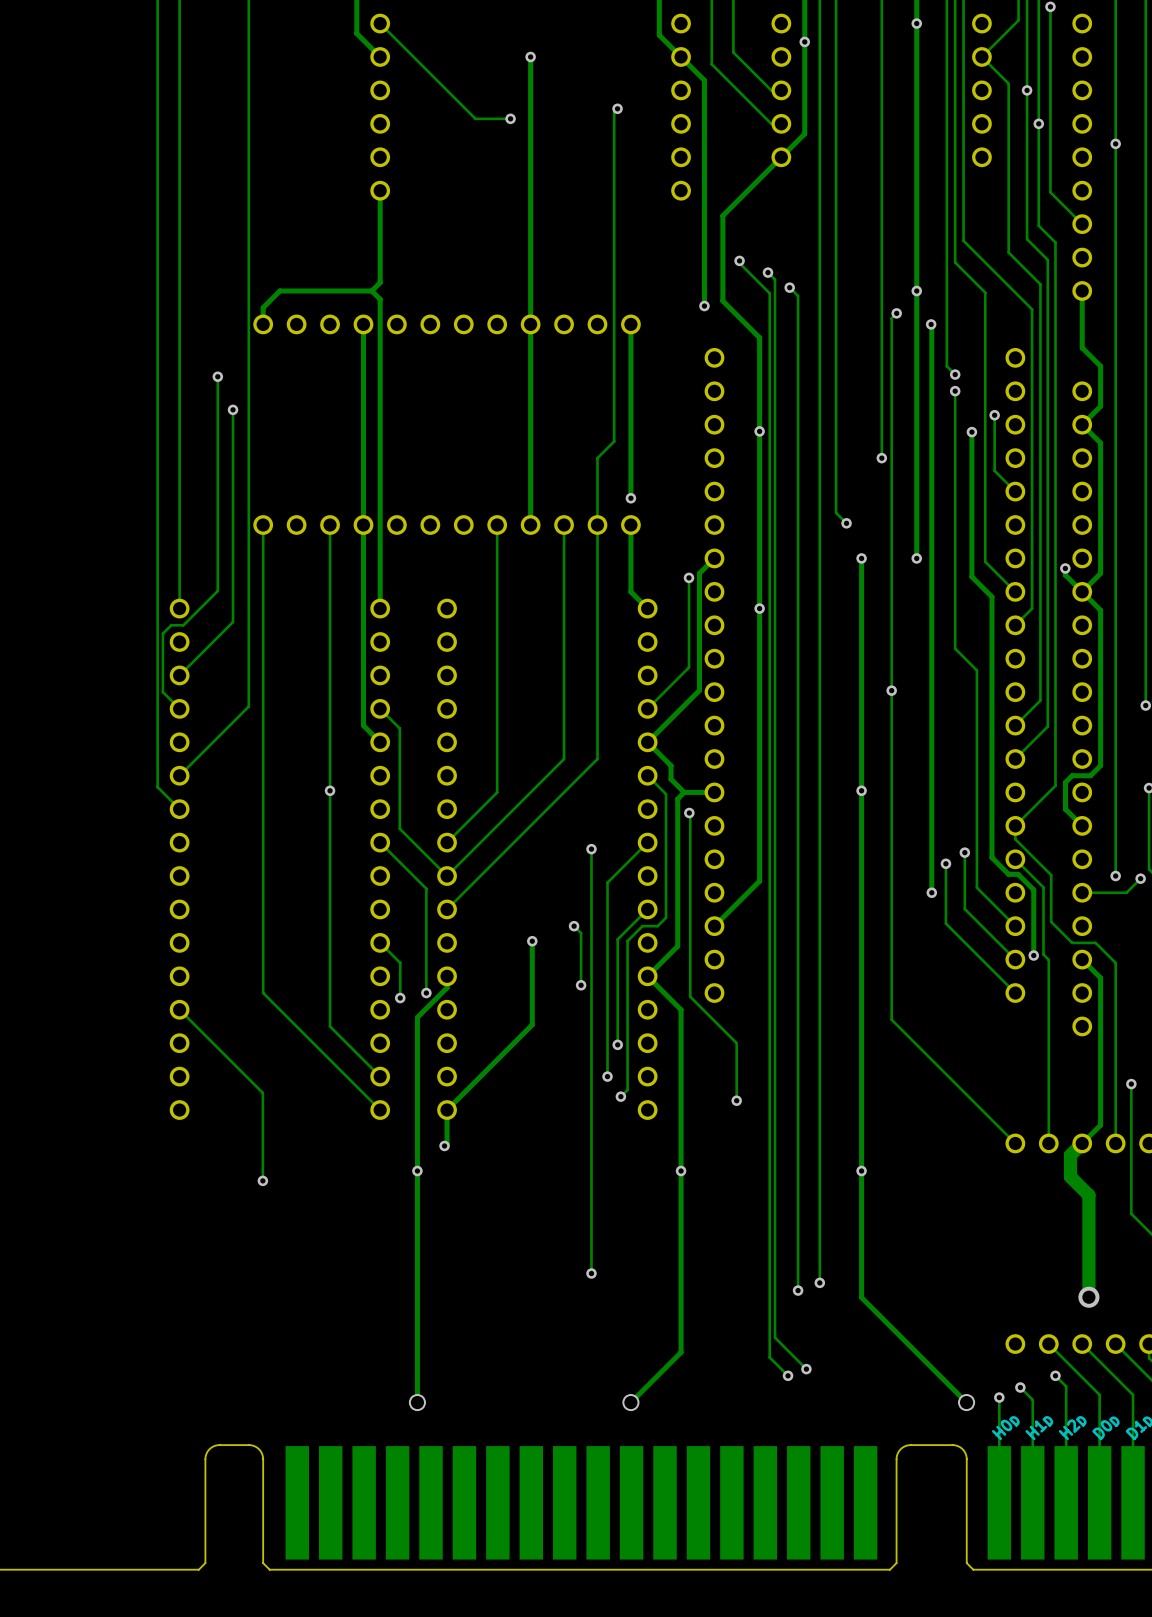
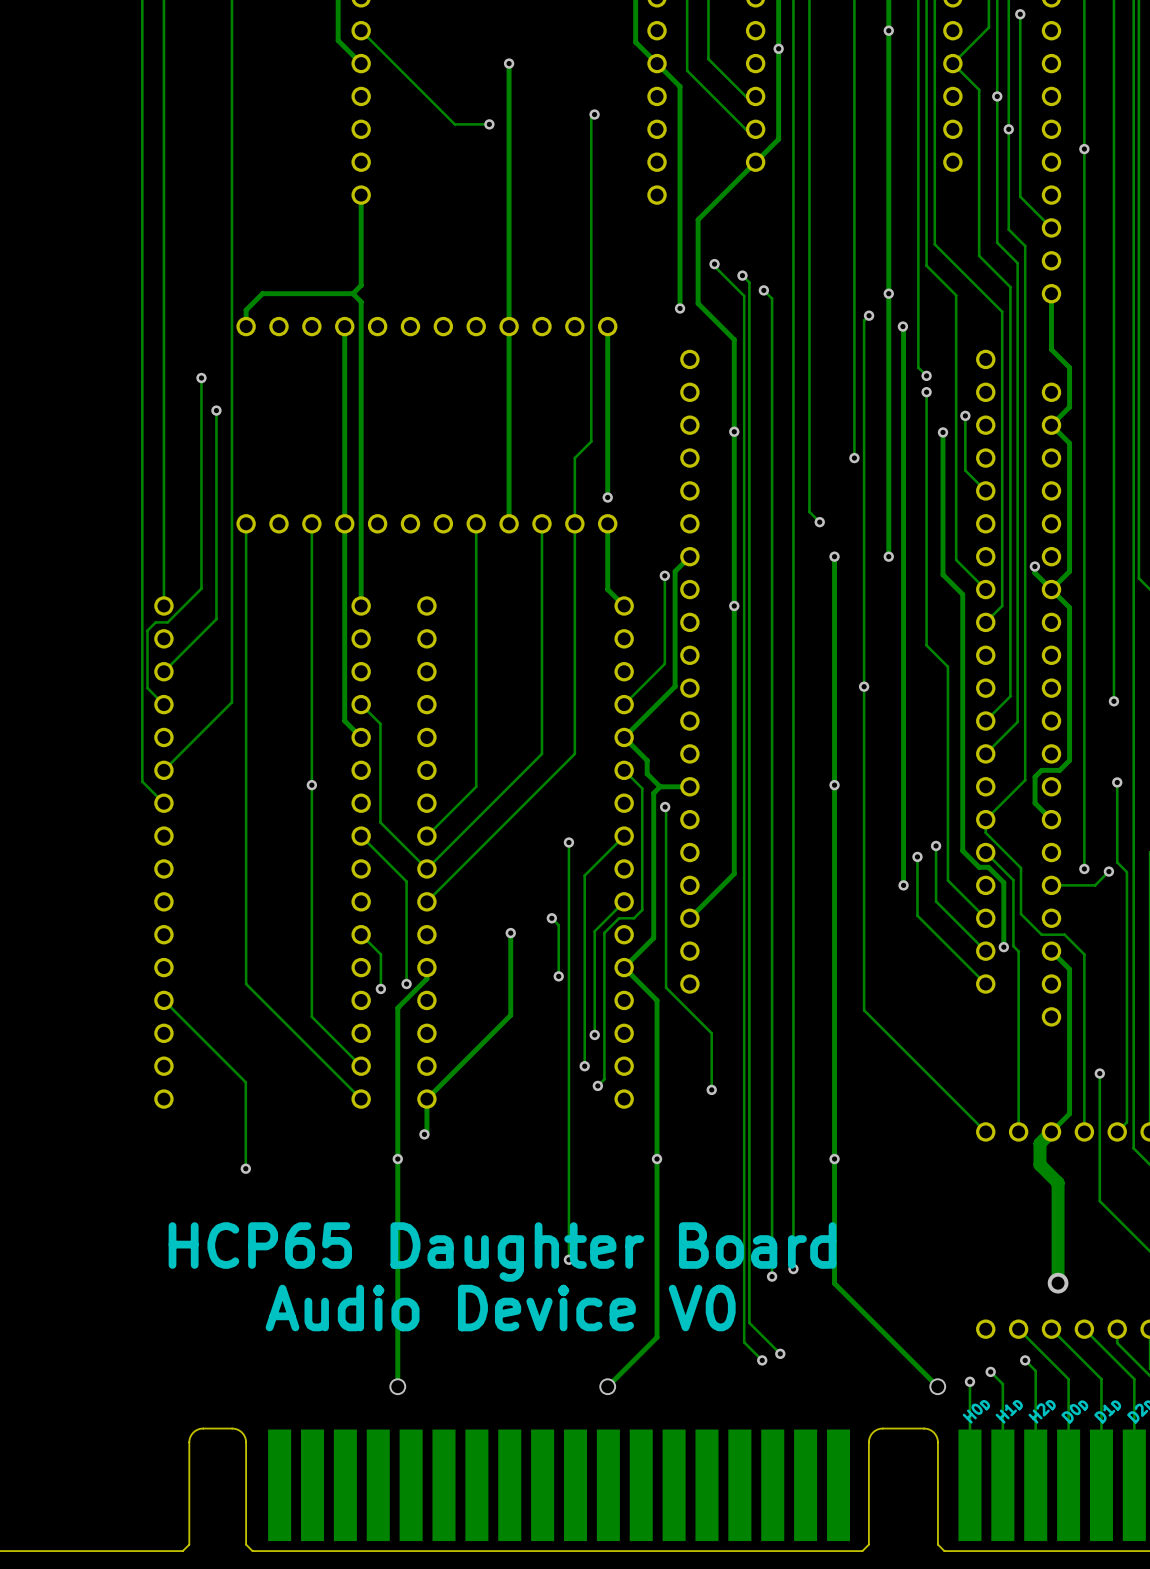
text: none -> HCP65 Daughter Board (502, 1251)
text: none -> Audio Device V0 (500, 1308)

